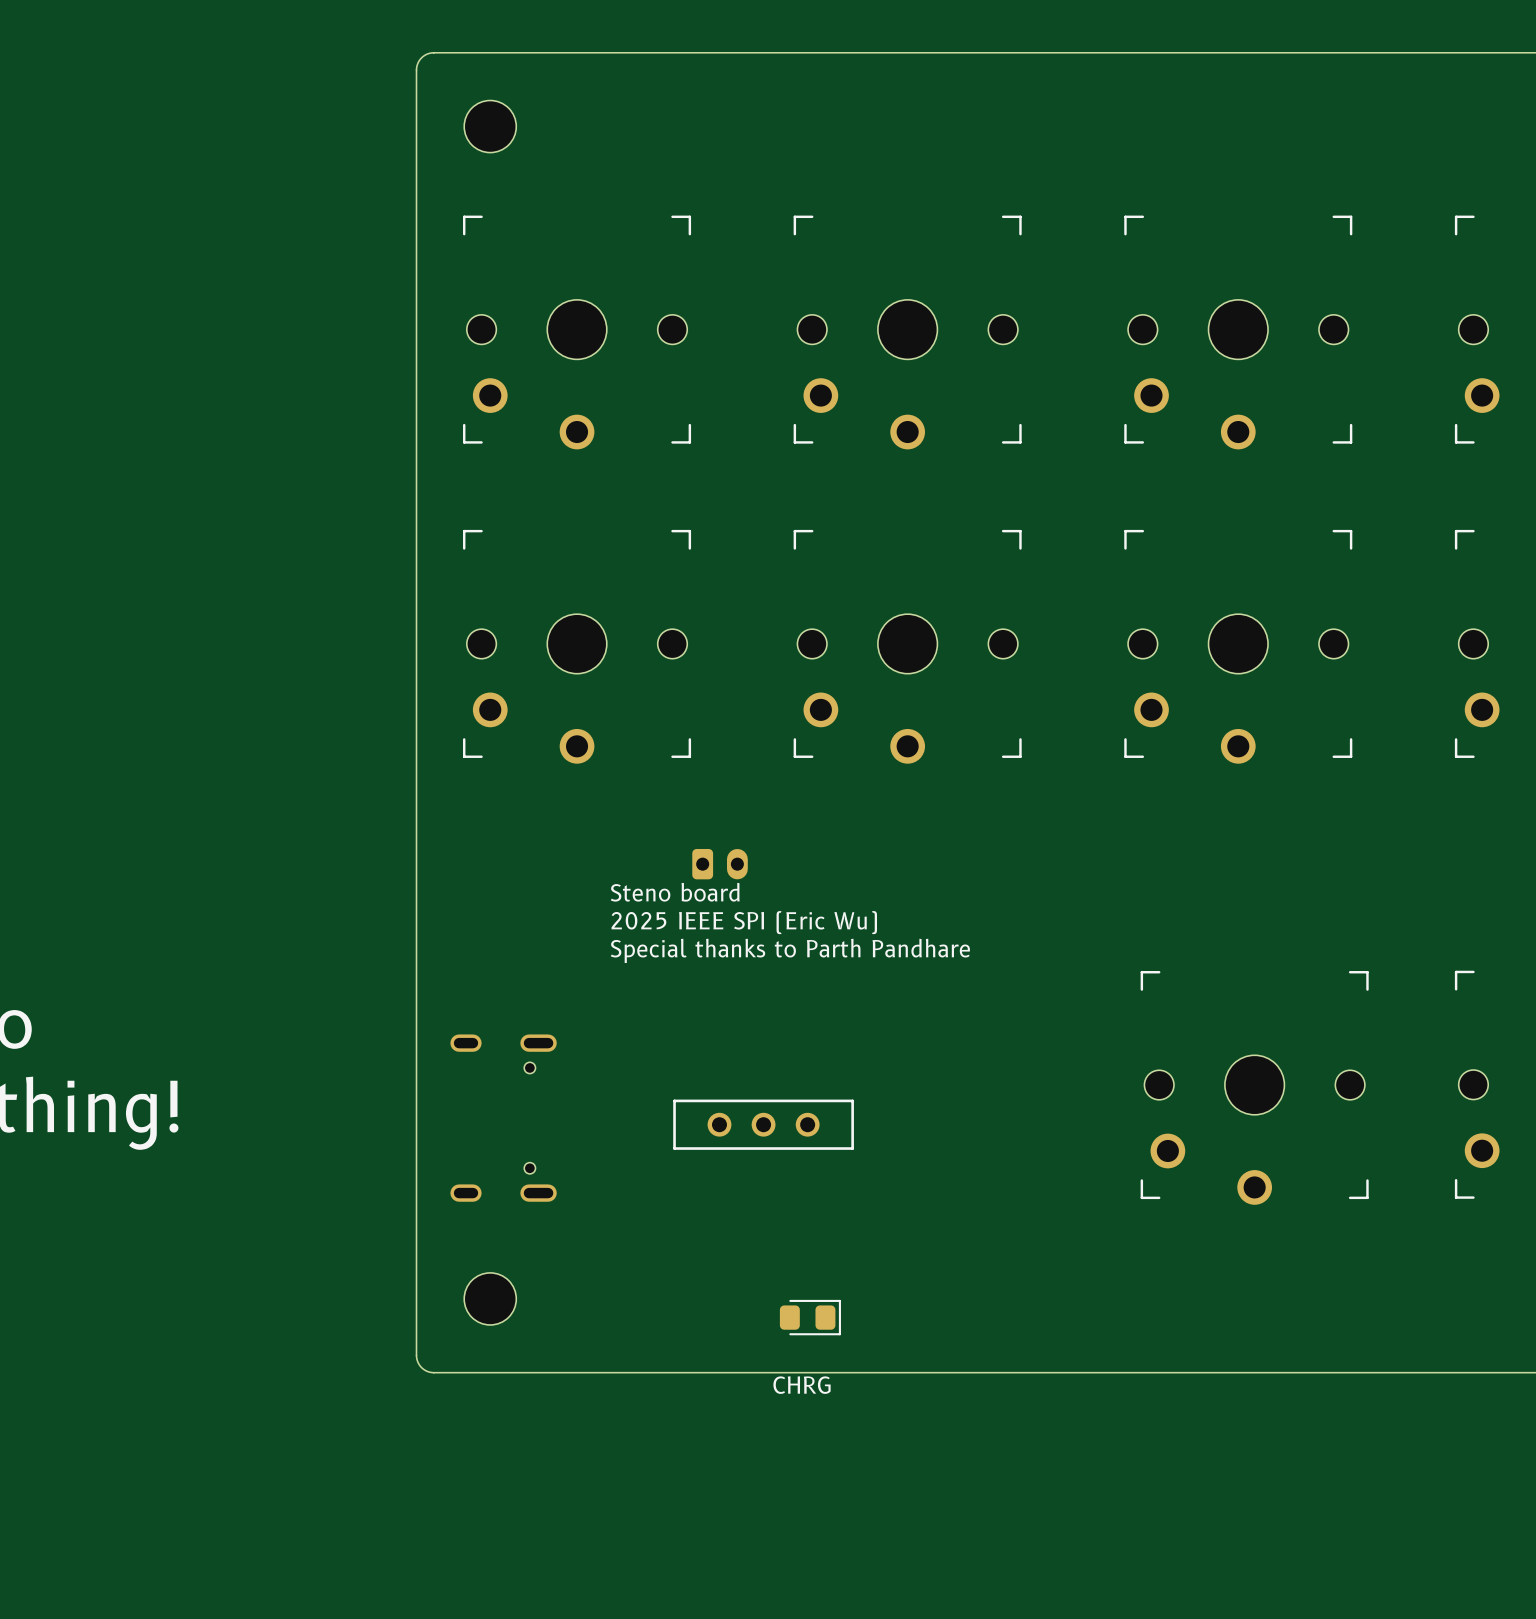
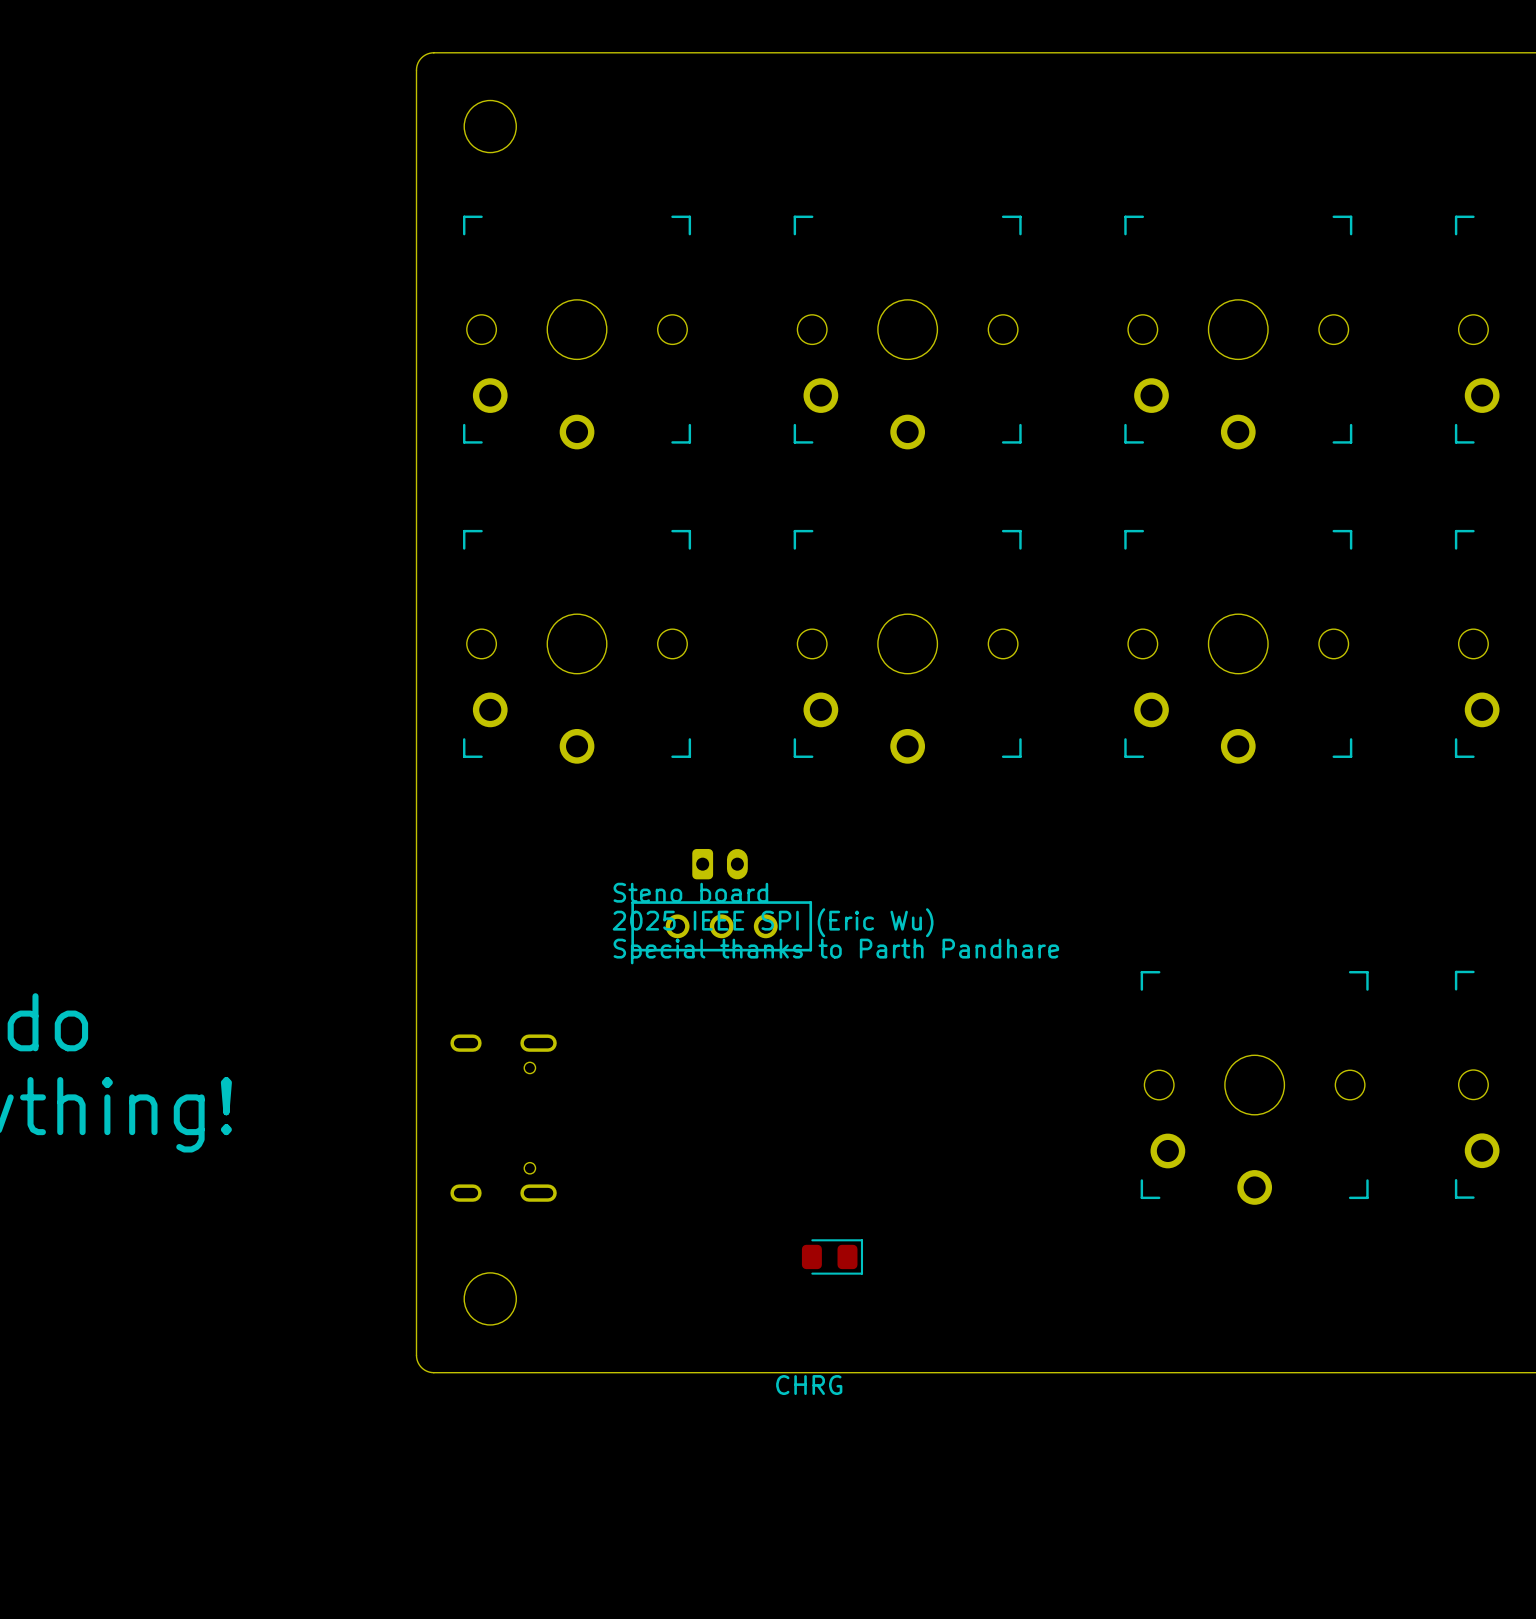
part position: (763, 1124) -> (721, 926)
part position: (810, 1317) -> (832, 1256)

